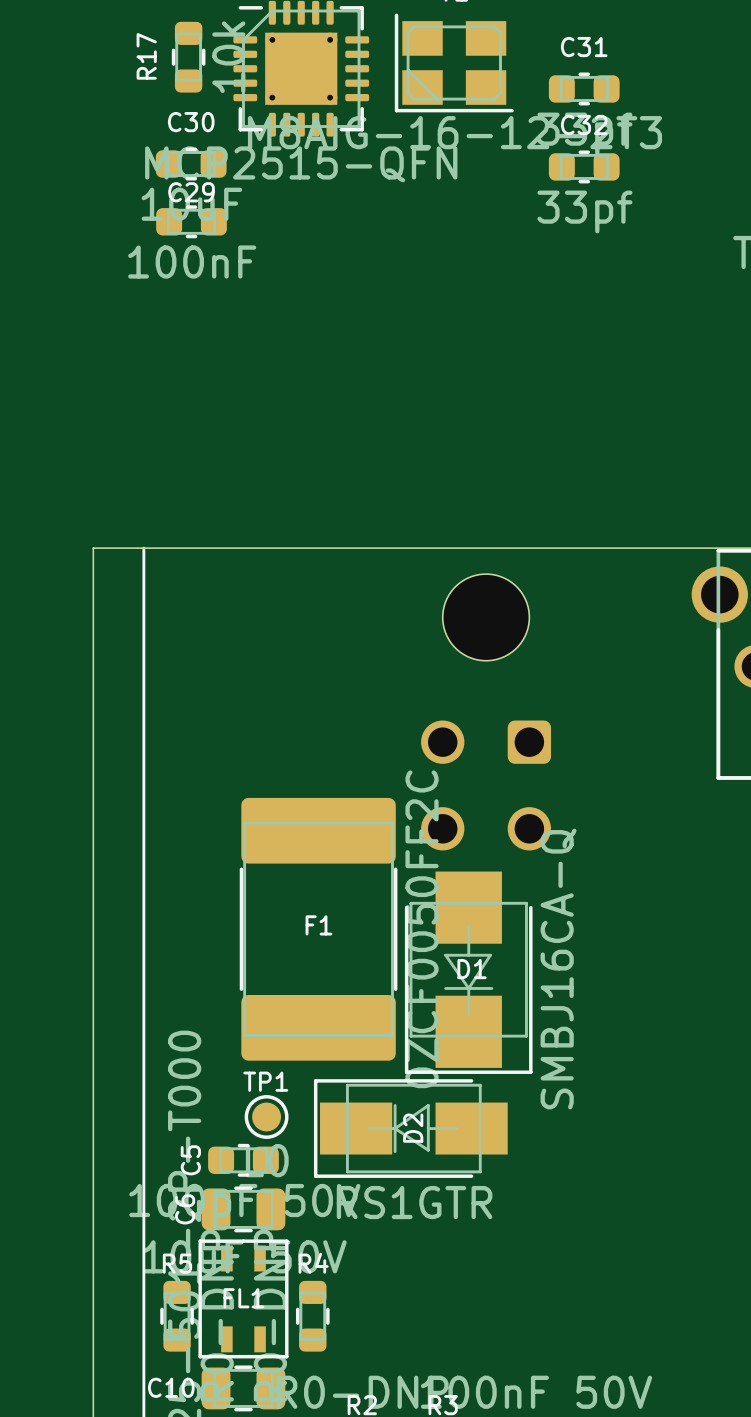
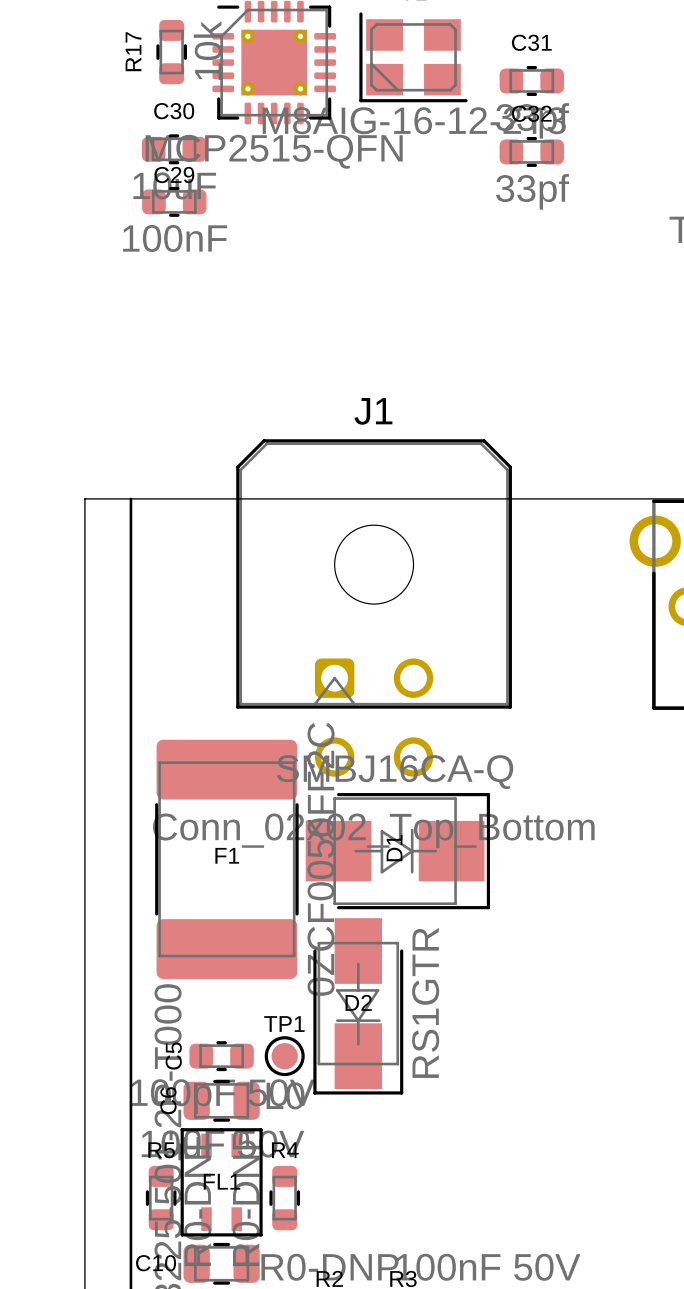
J1 side: bottom (486, 712) -> top (374, 607)
F1 position: (318, 929) -> (226, 859)
D1 rotation: 0° (468, 972) -> 90° counterclockwise (397, 851)
TP1 position: (266, 1116) -> (284, 1056)
D2 rotation: 0° (410, 1128) -> 90° counterclockwise (358, 1006)

